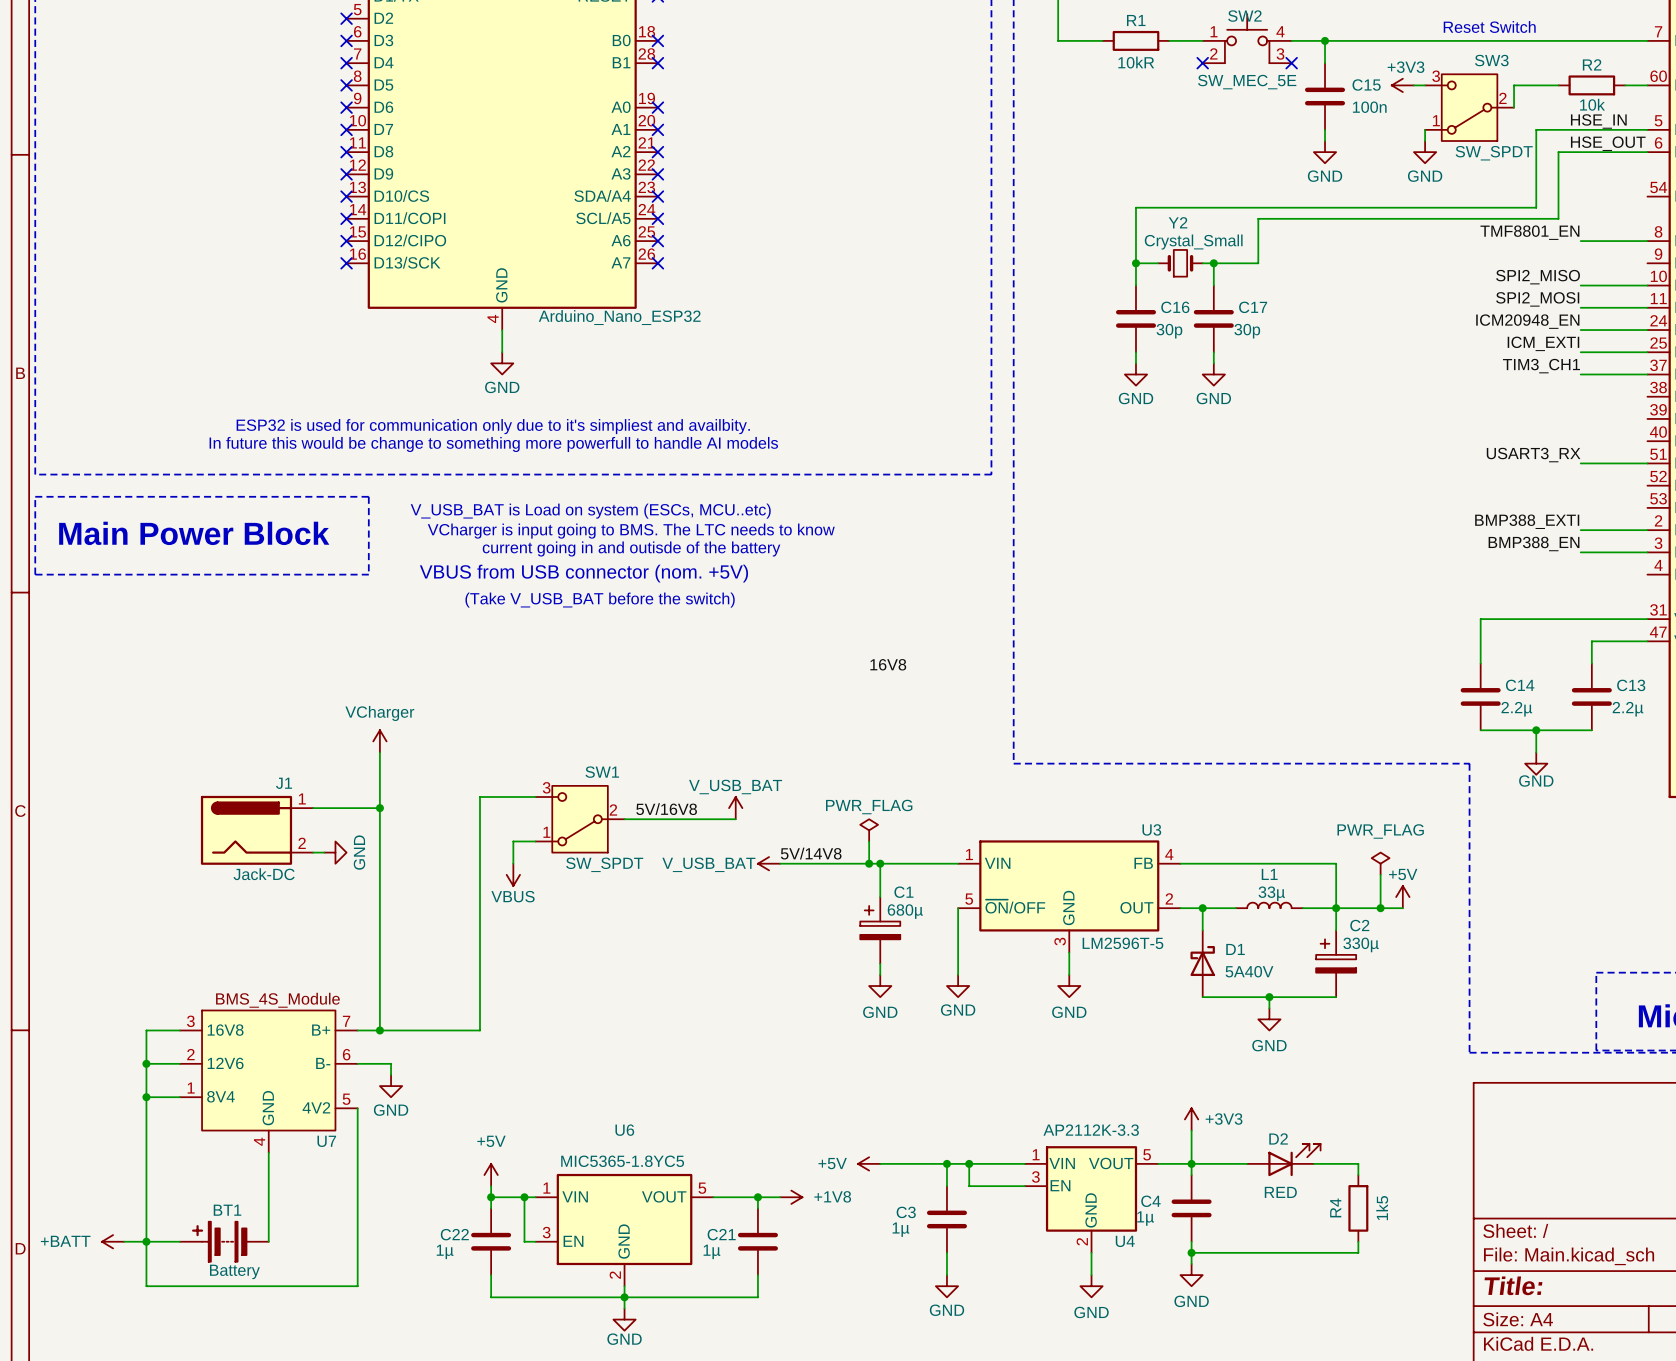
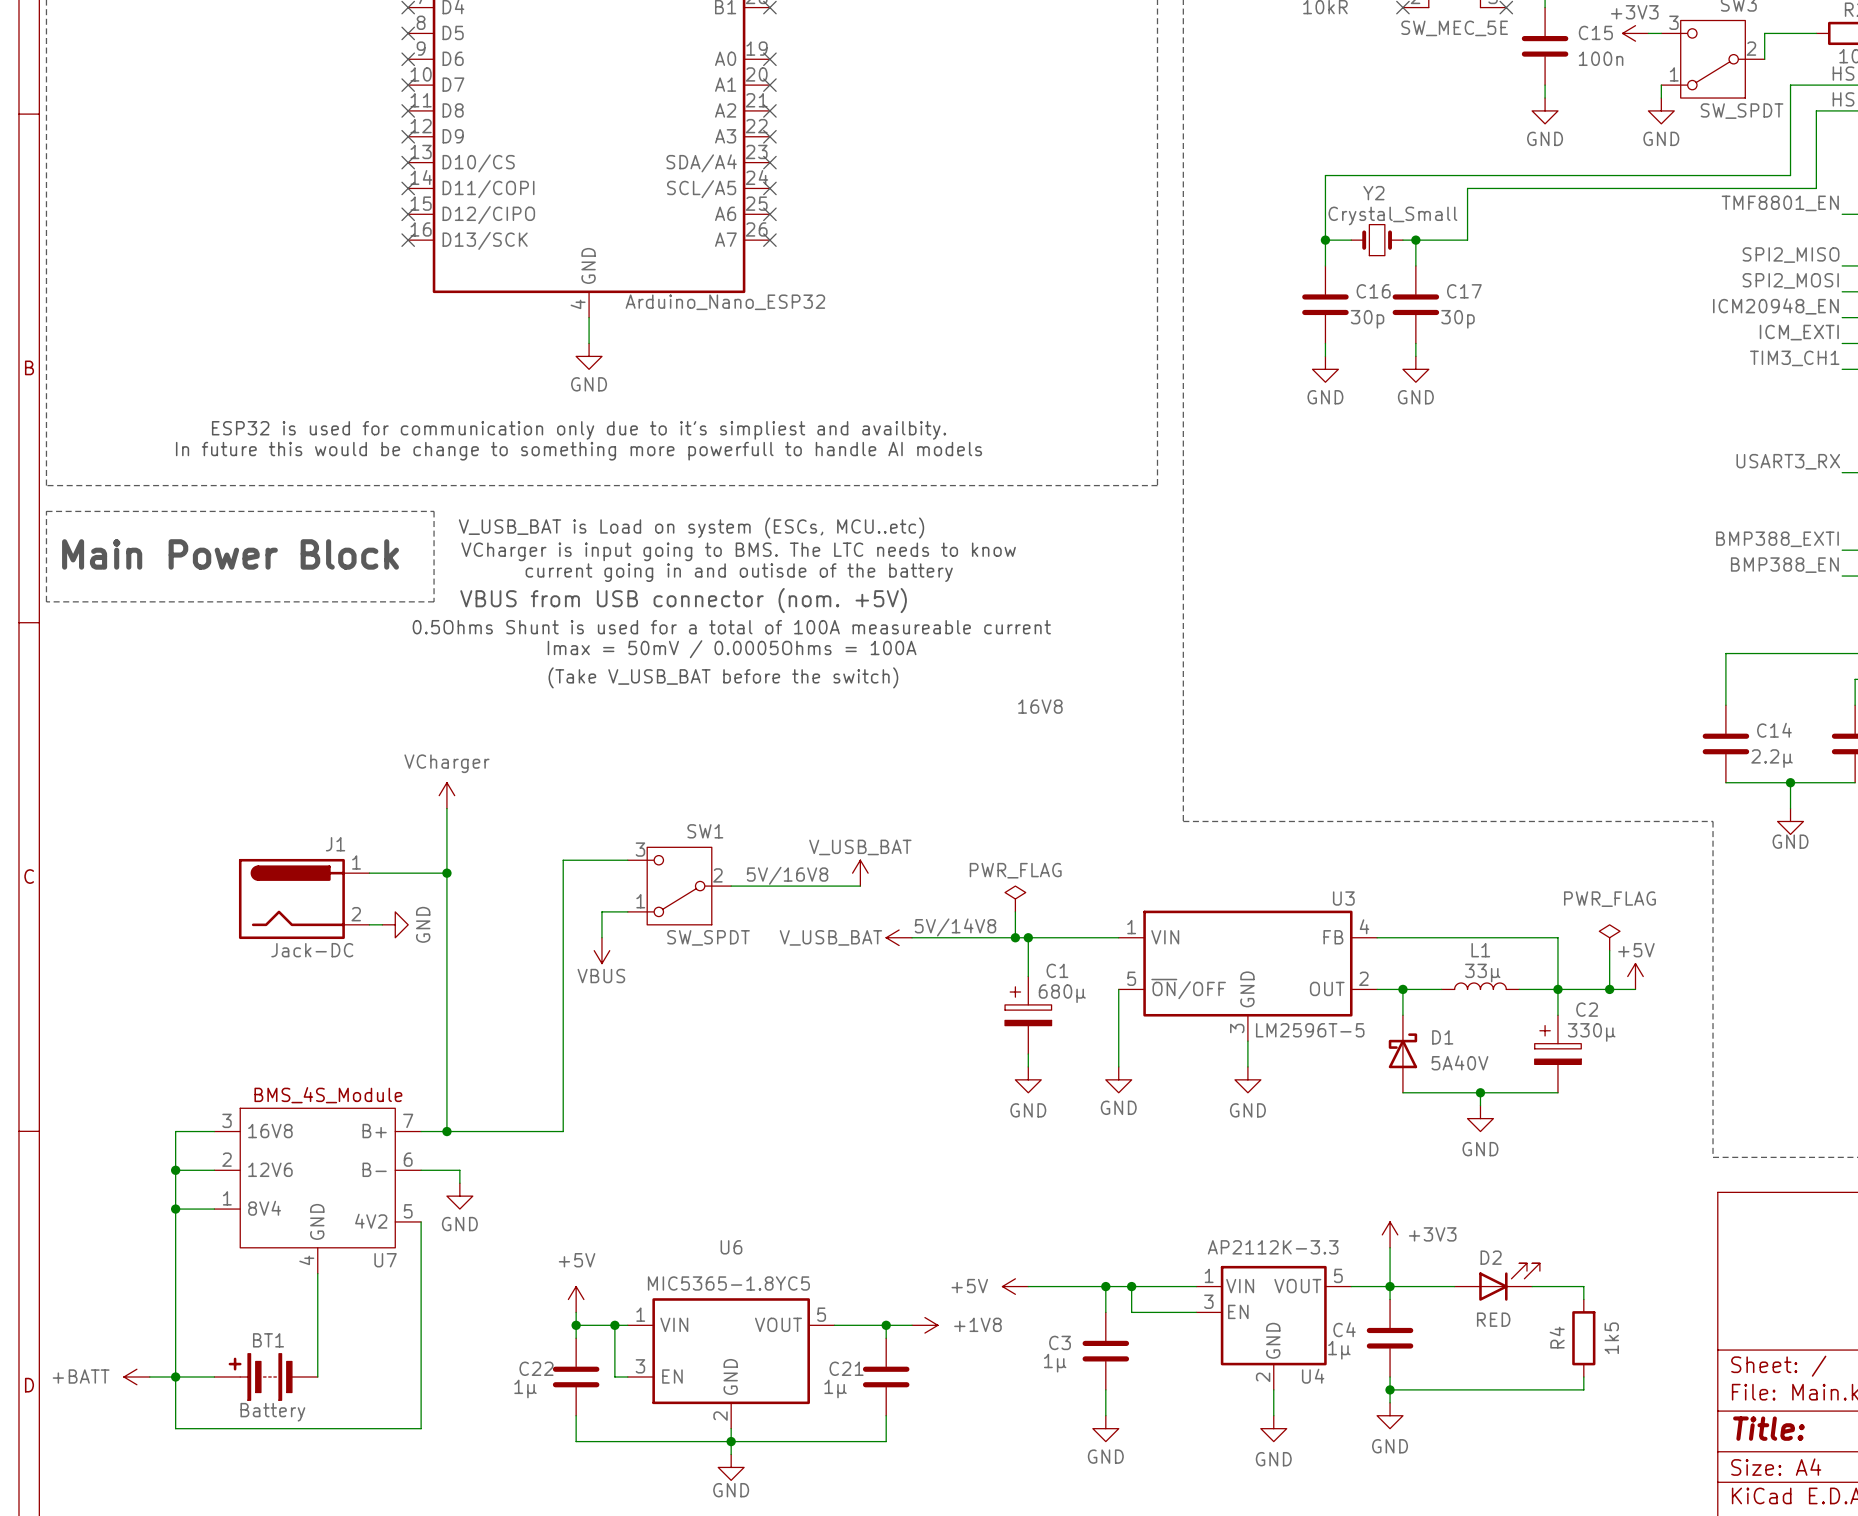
text: none -> 0.5Ohms Shunt is used for a total of 100A measureable current (731, 627)
text position: (Take V_USB_BAT before the switch) (600, 600) -> (Take V_USB_BAT before the switch) (723, 677)
text: none -> Imax = 50mV / 0.0005Ohms = 100A (732, 649)

